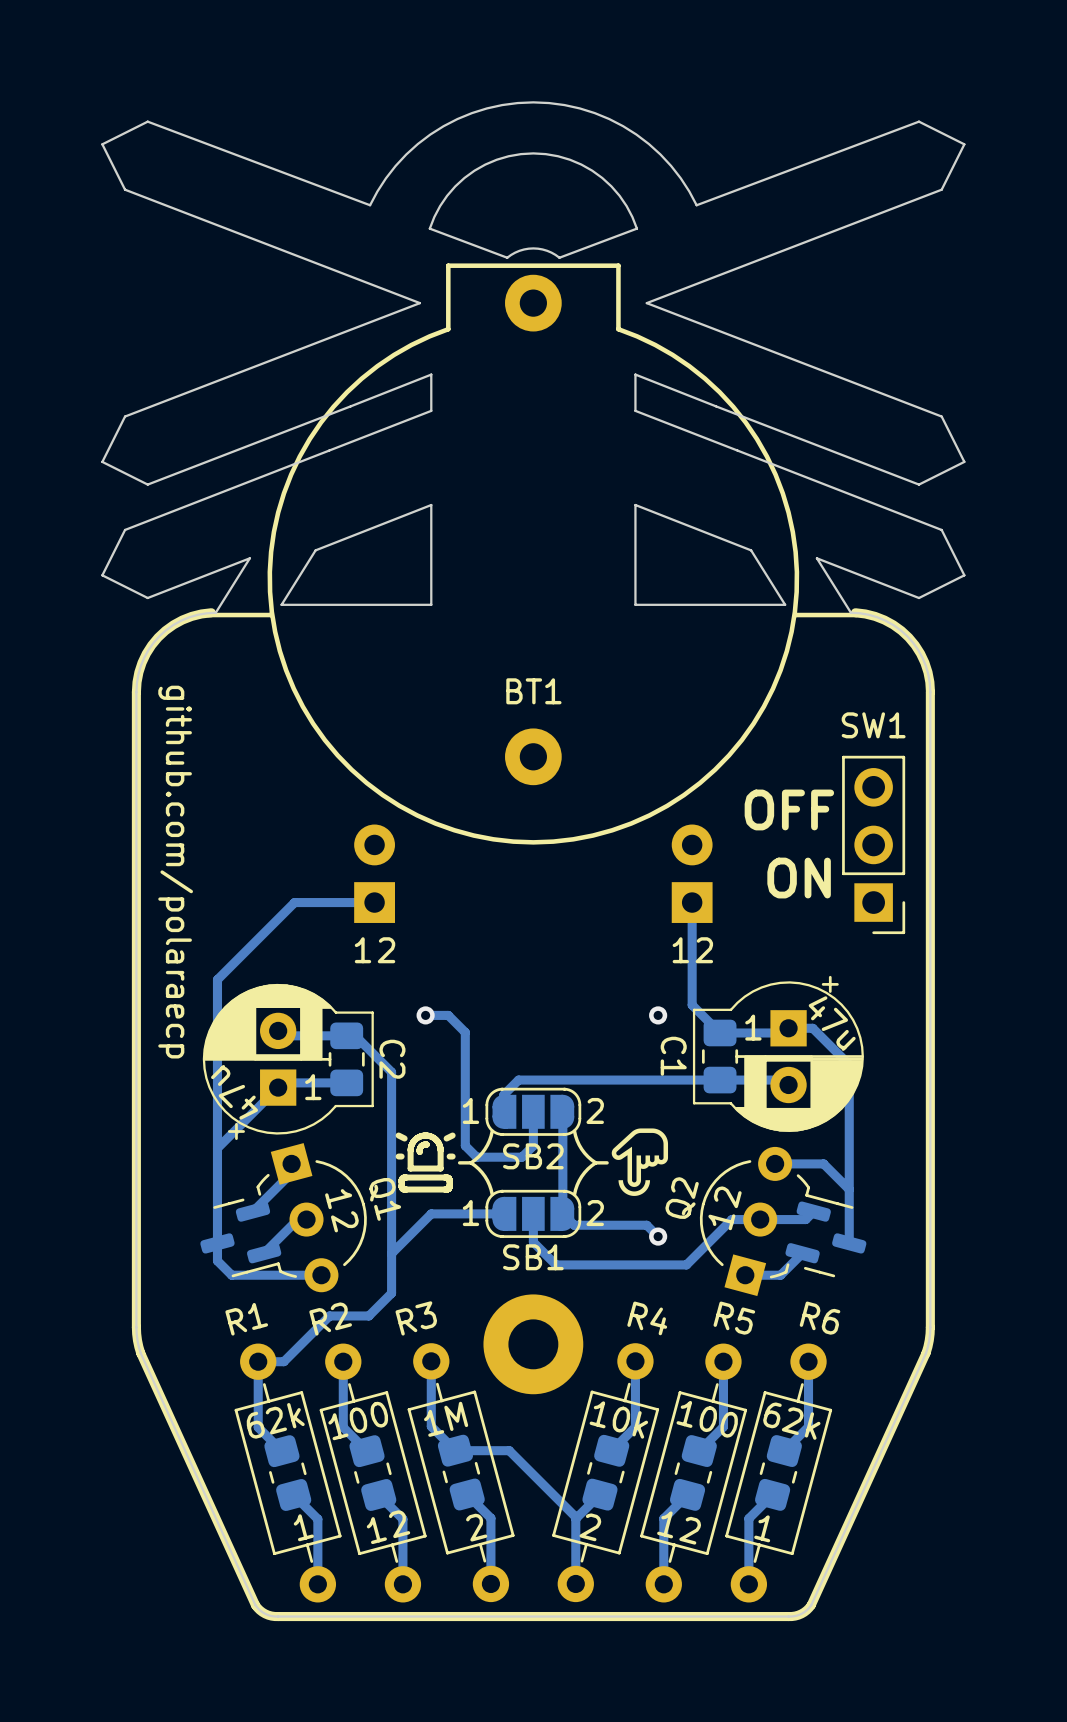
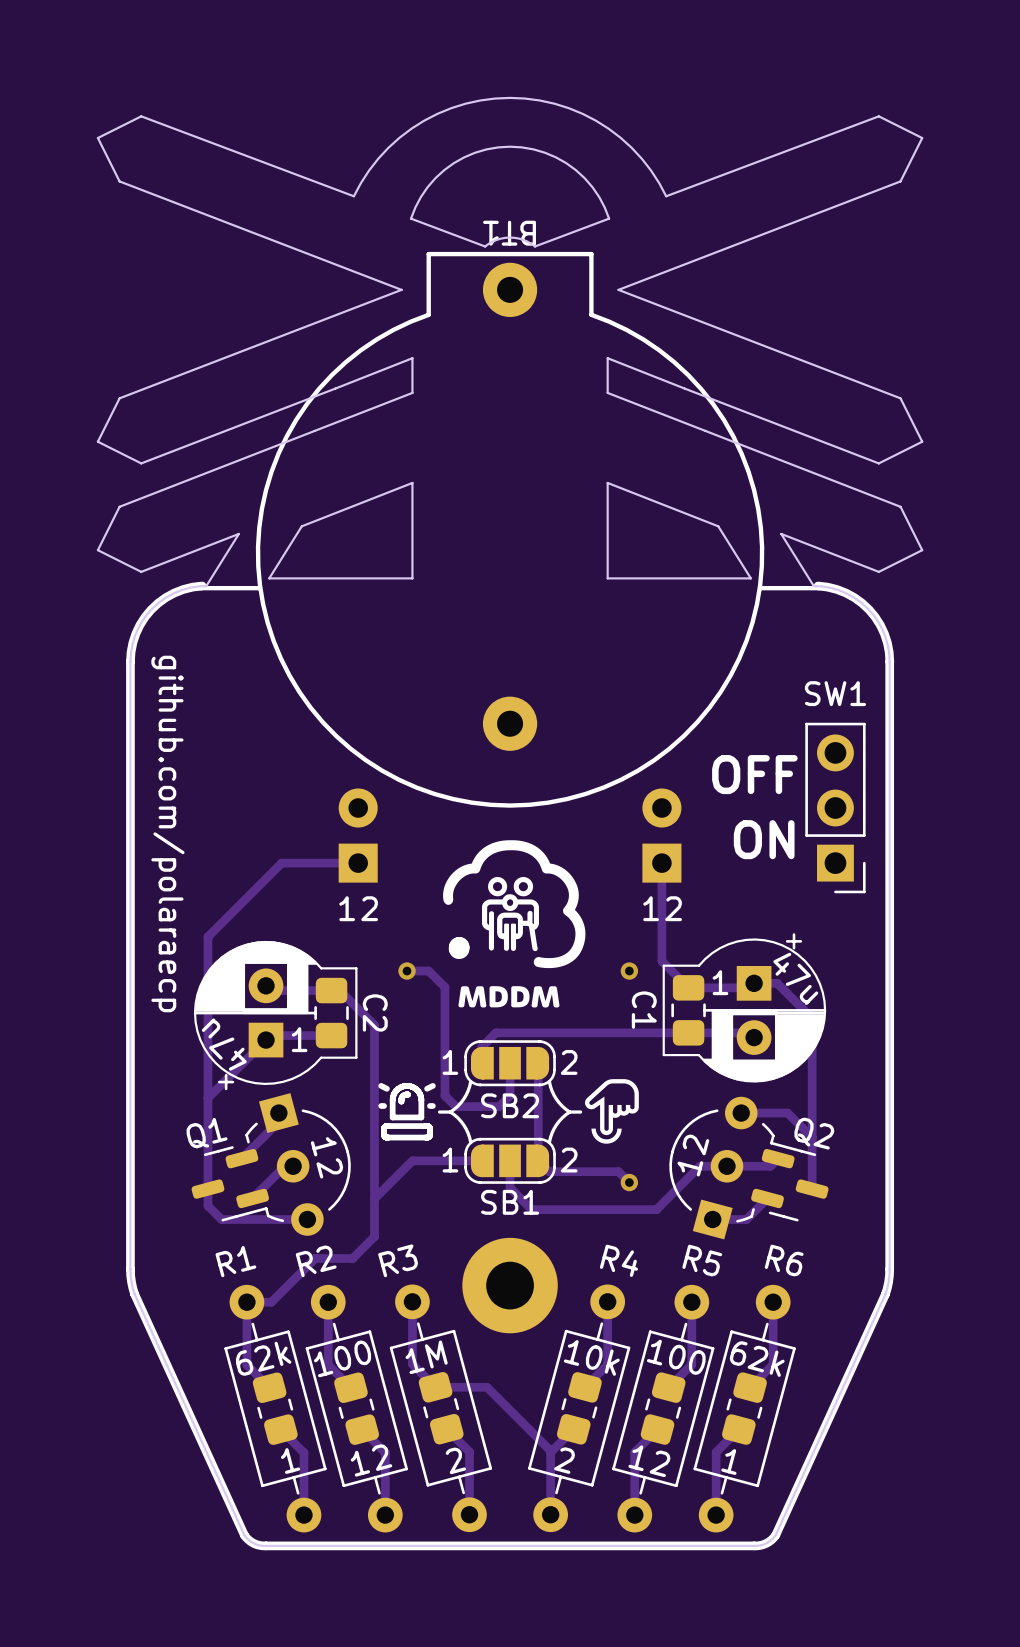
BT1 name rotation: 0° (533, 691) -> 180° (509, 233)
BT1 name position: BT1 (533, 691) -> BT1 (509, 233)
drawing: none -> [443, 840, 586, 1008]
Q2 name rotation: 0° (682, 1198) -> 90° clockwise (814, 1133)
Q2 name position: Q2 (682, 1198) -> Q2 (814, 1133)
Q1 name rotation: 0° (385, 1199) -> 90° counterclockwise (207, 1133)
Q1 name position: Q1 (385, 1199) -> Q1 (207, 1133)

